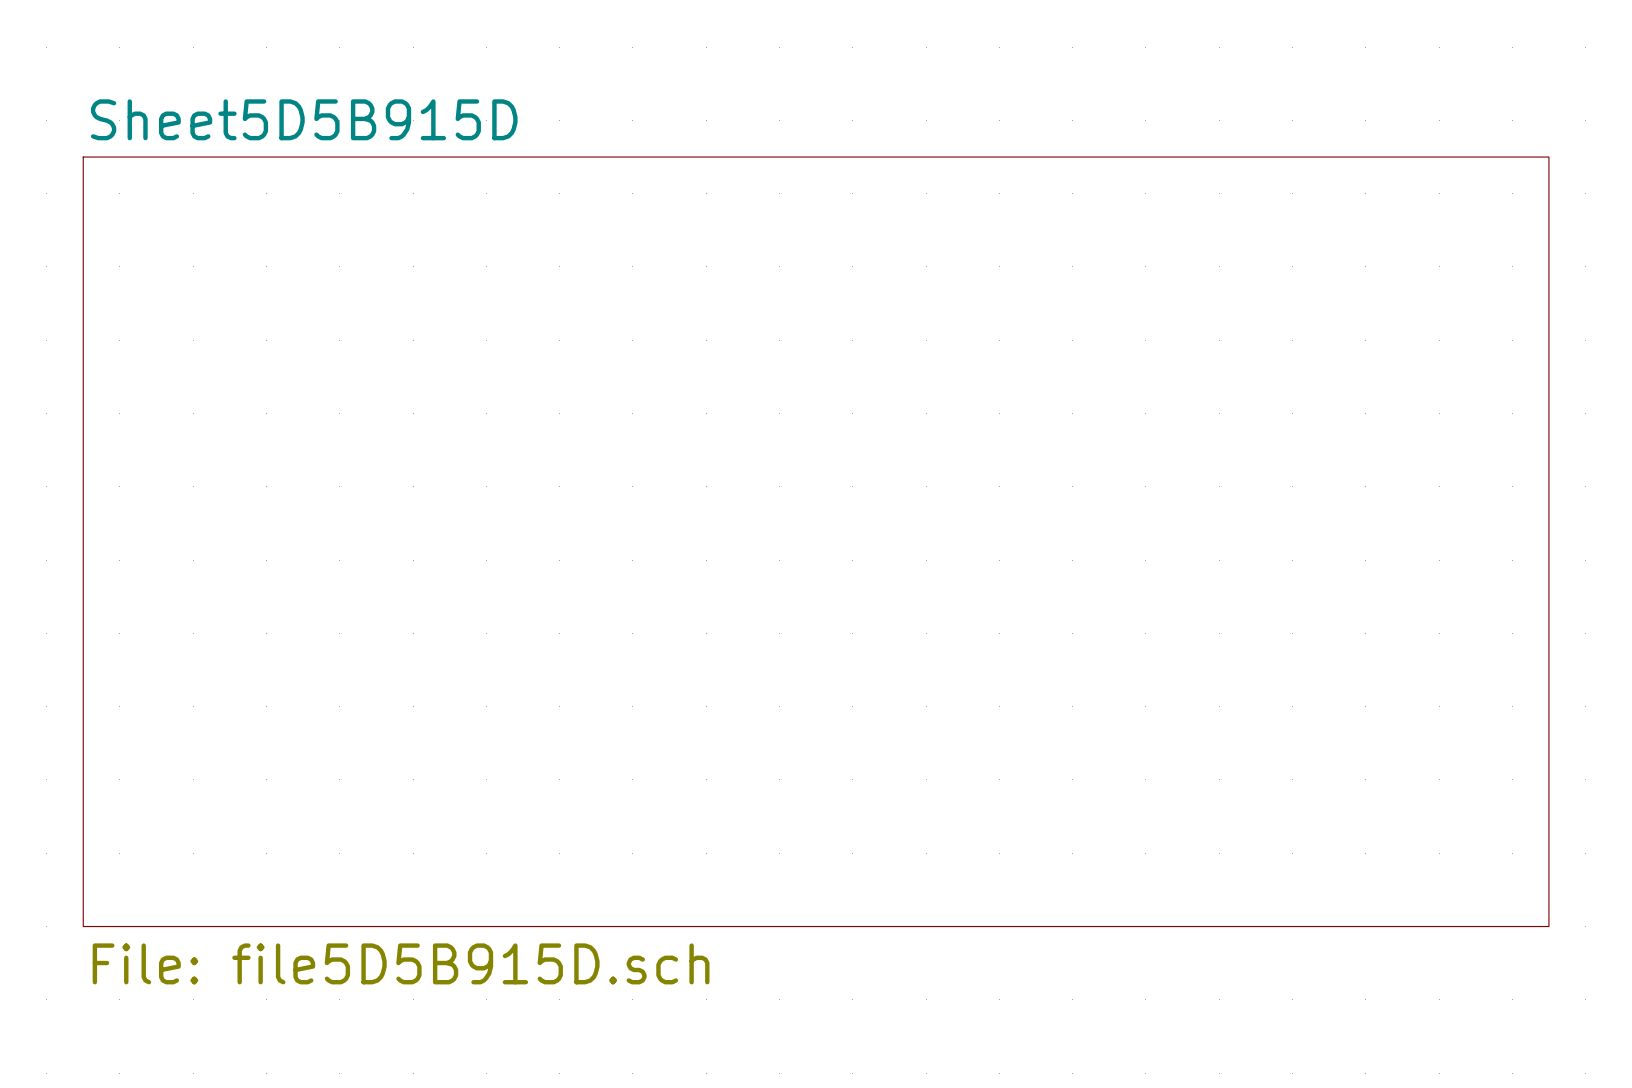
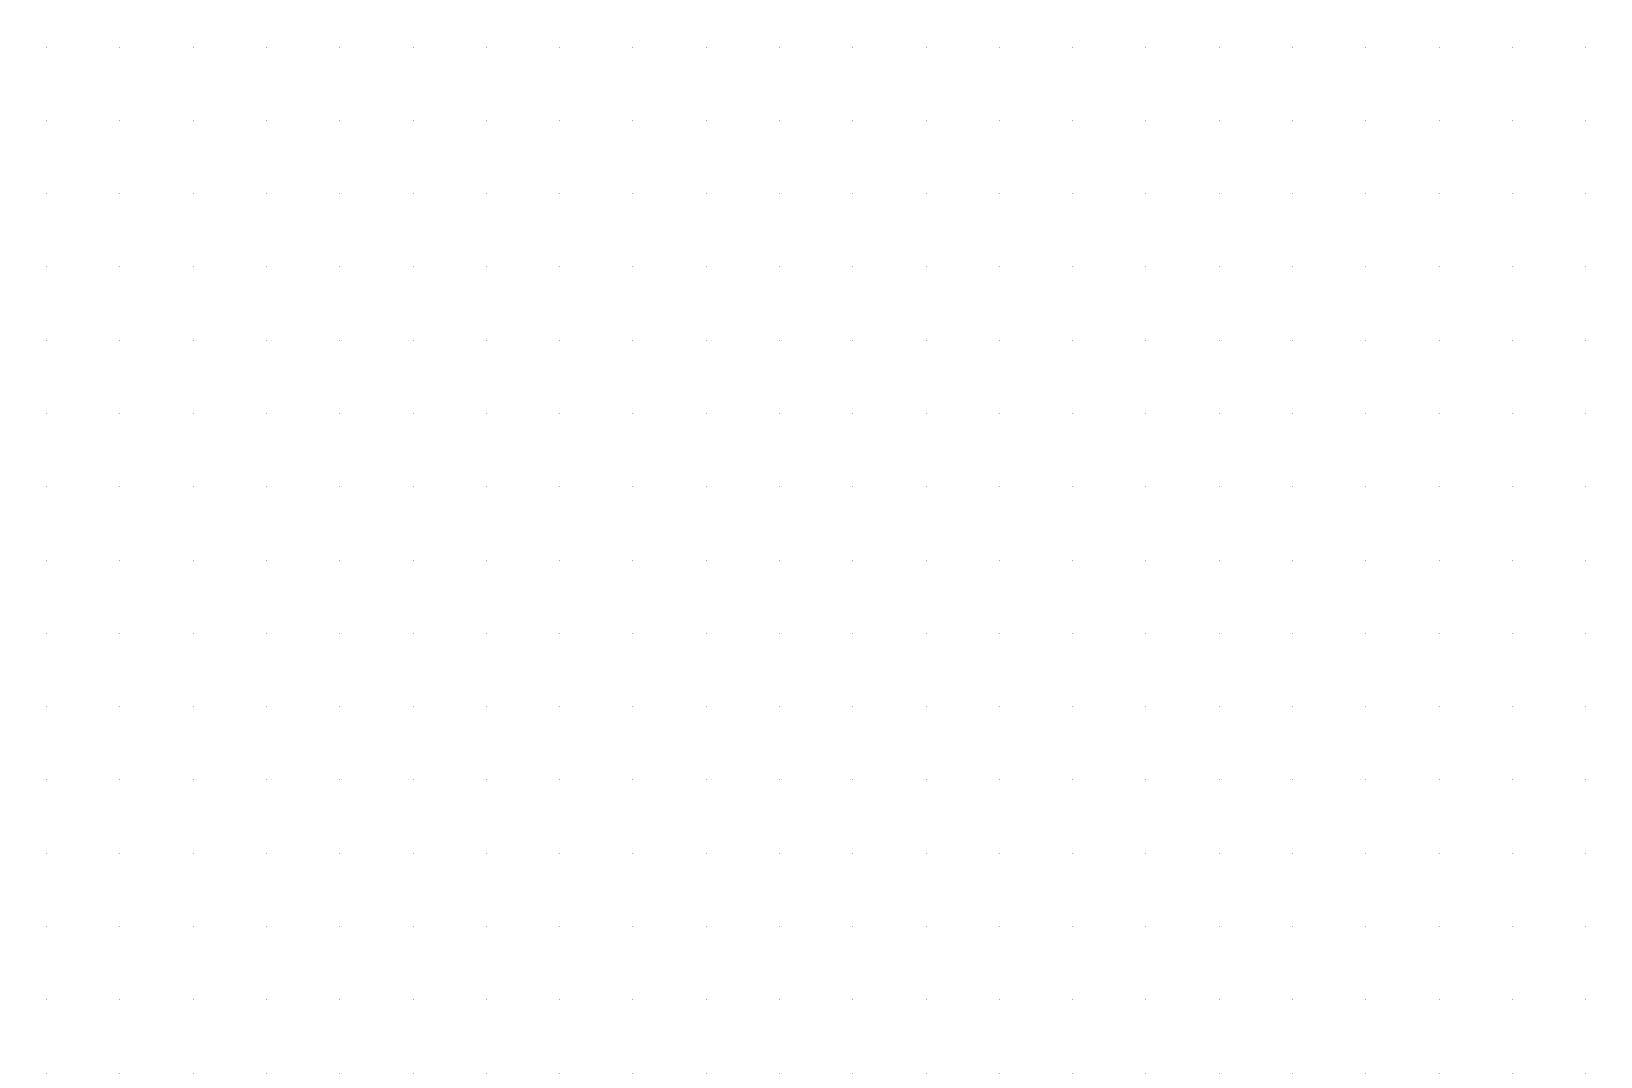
sheet Sheet5D5B915D: File: file5D5B915D.sch (816, 541) -> none

